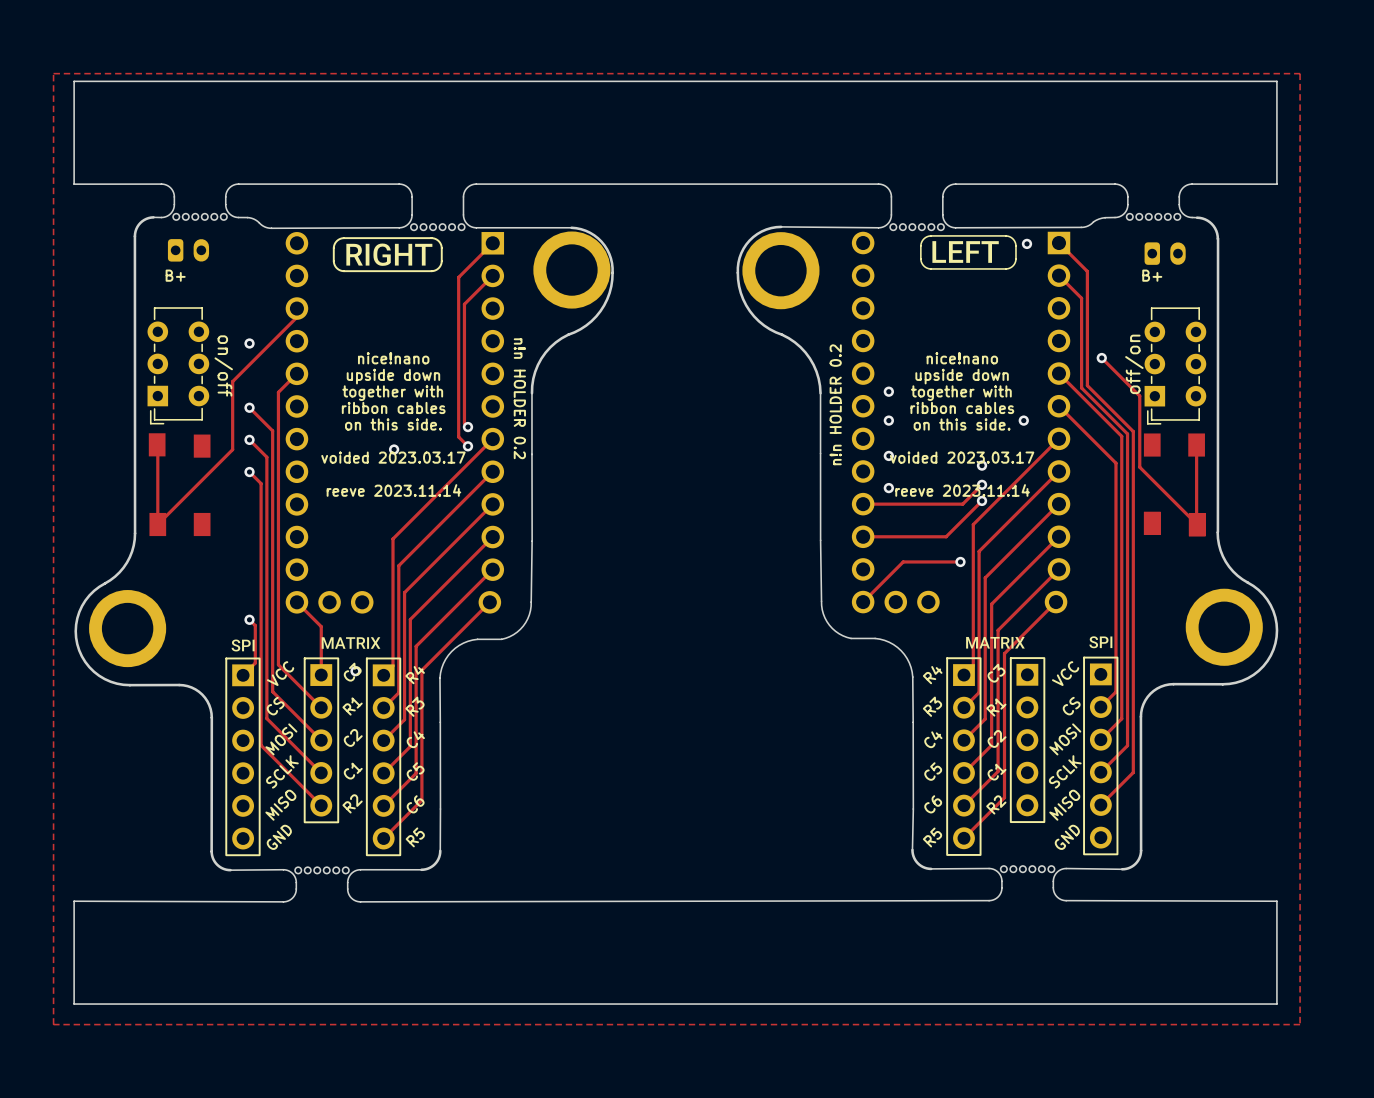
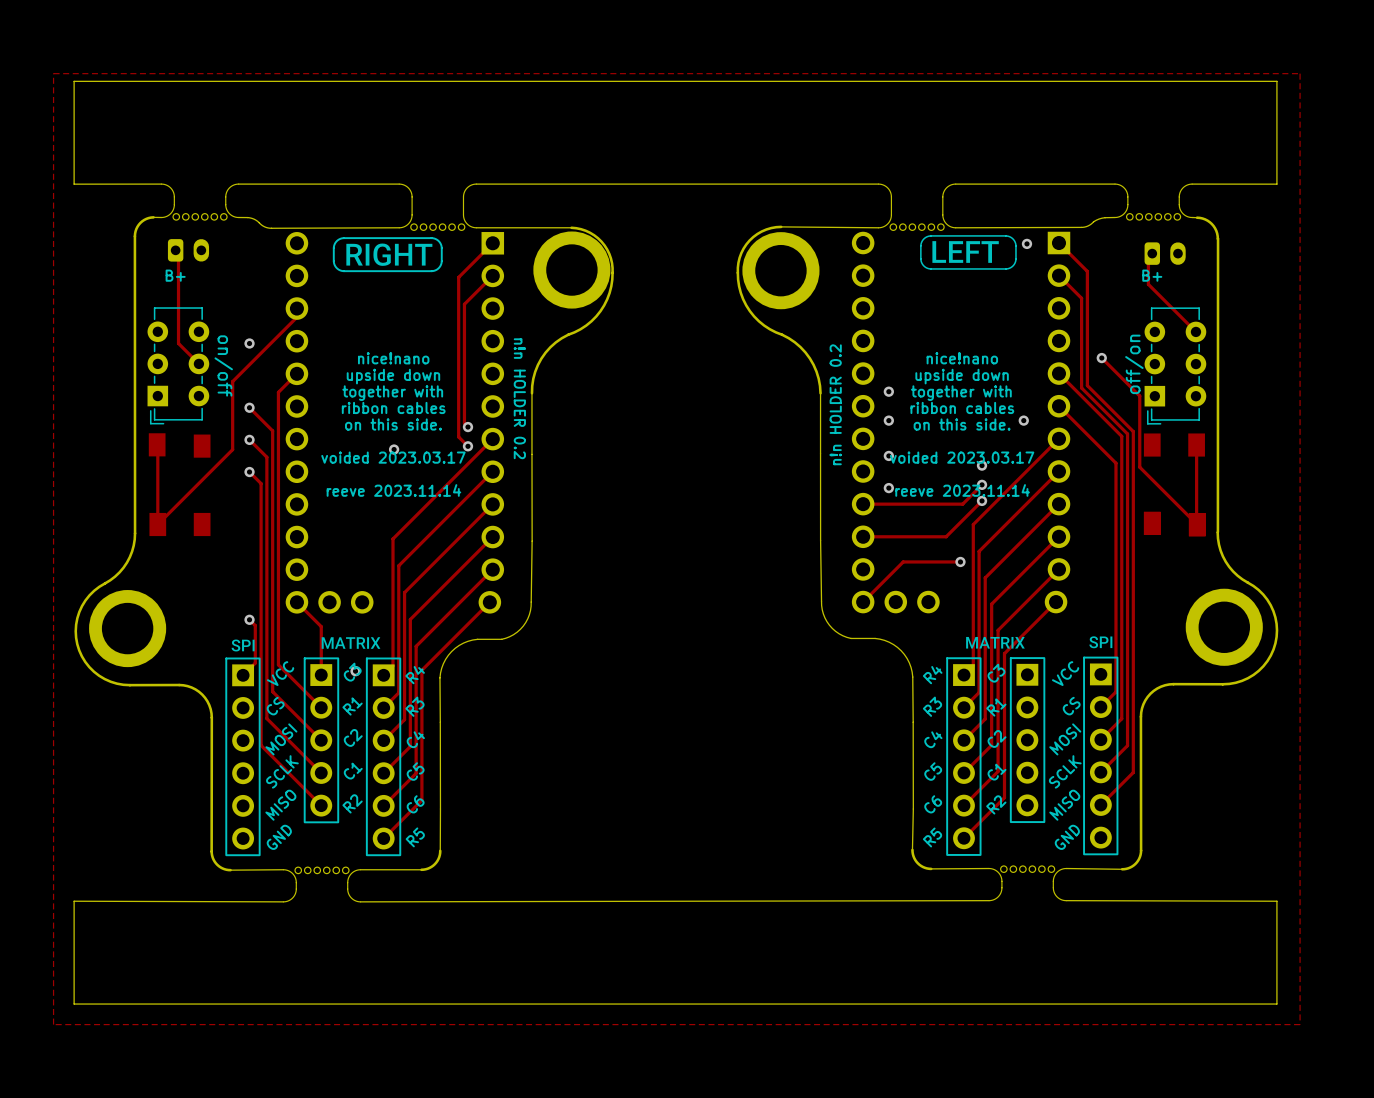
track: none -> (178, 250) (178, 343) (198, 363)
track: none -> (1148, 253) (1148, 284) (1195, 331)

